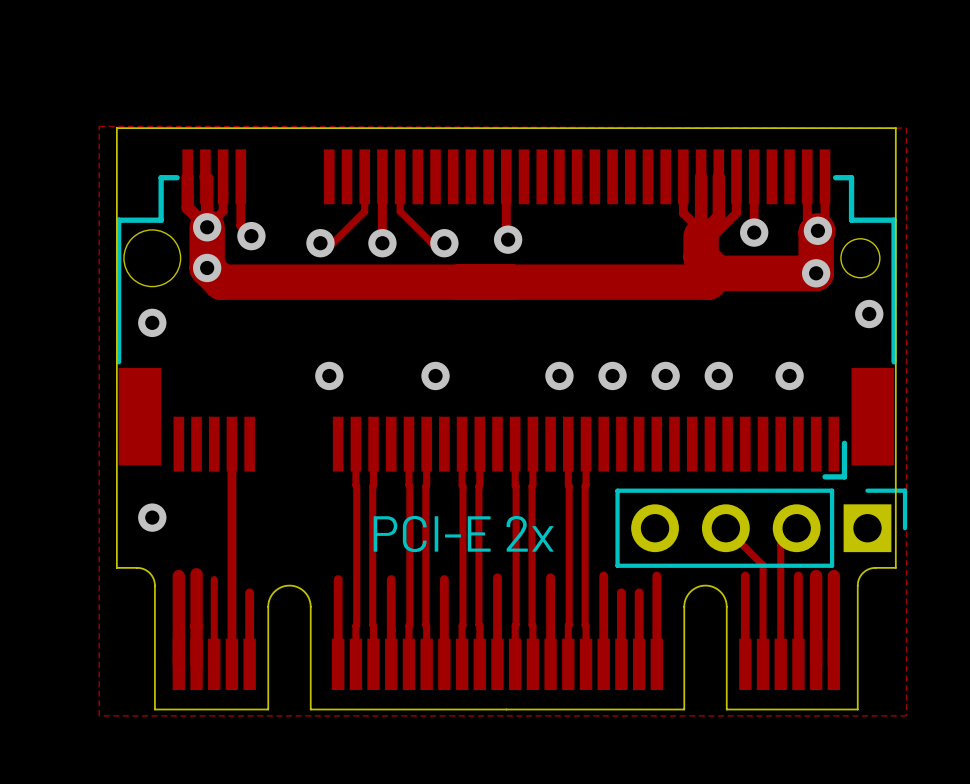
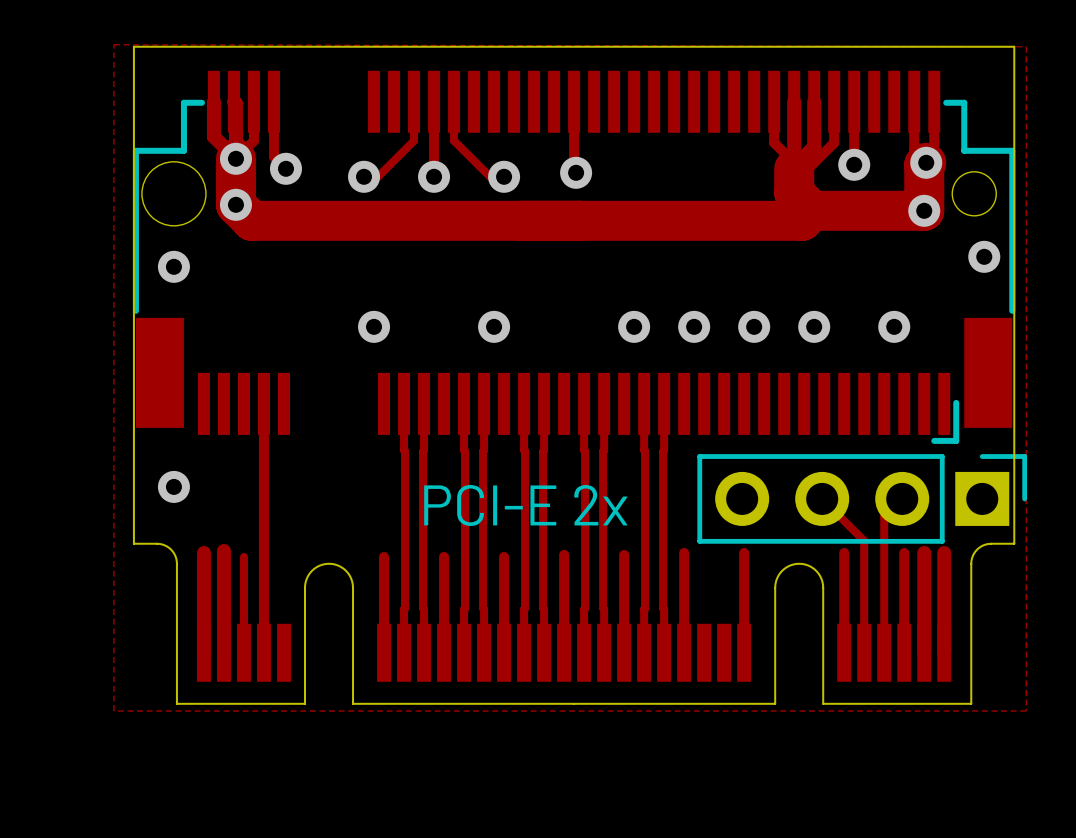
track: (249, 592) (249, 664) -> none
track: (621, 592) (621, 664) -> none
track: (639, 592) (639, 664) -> none

